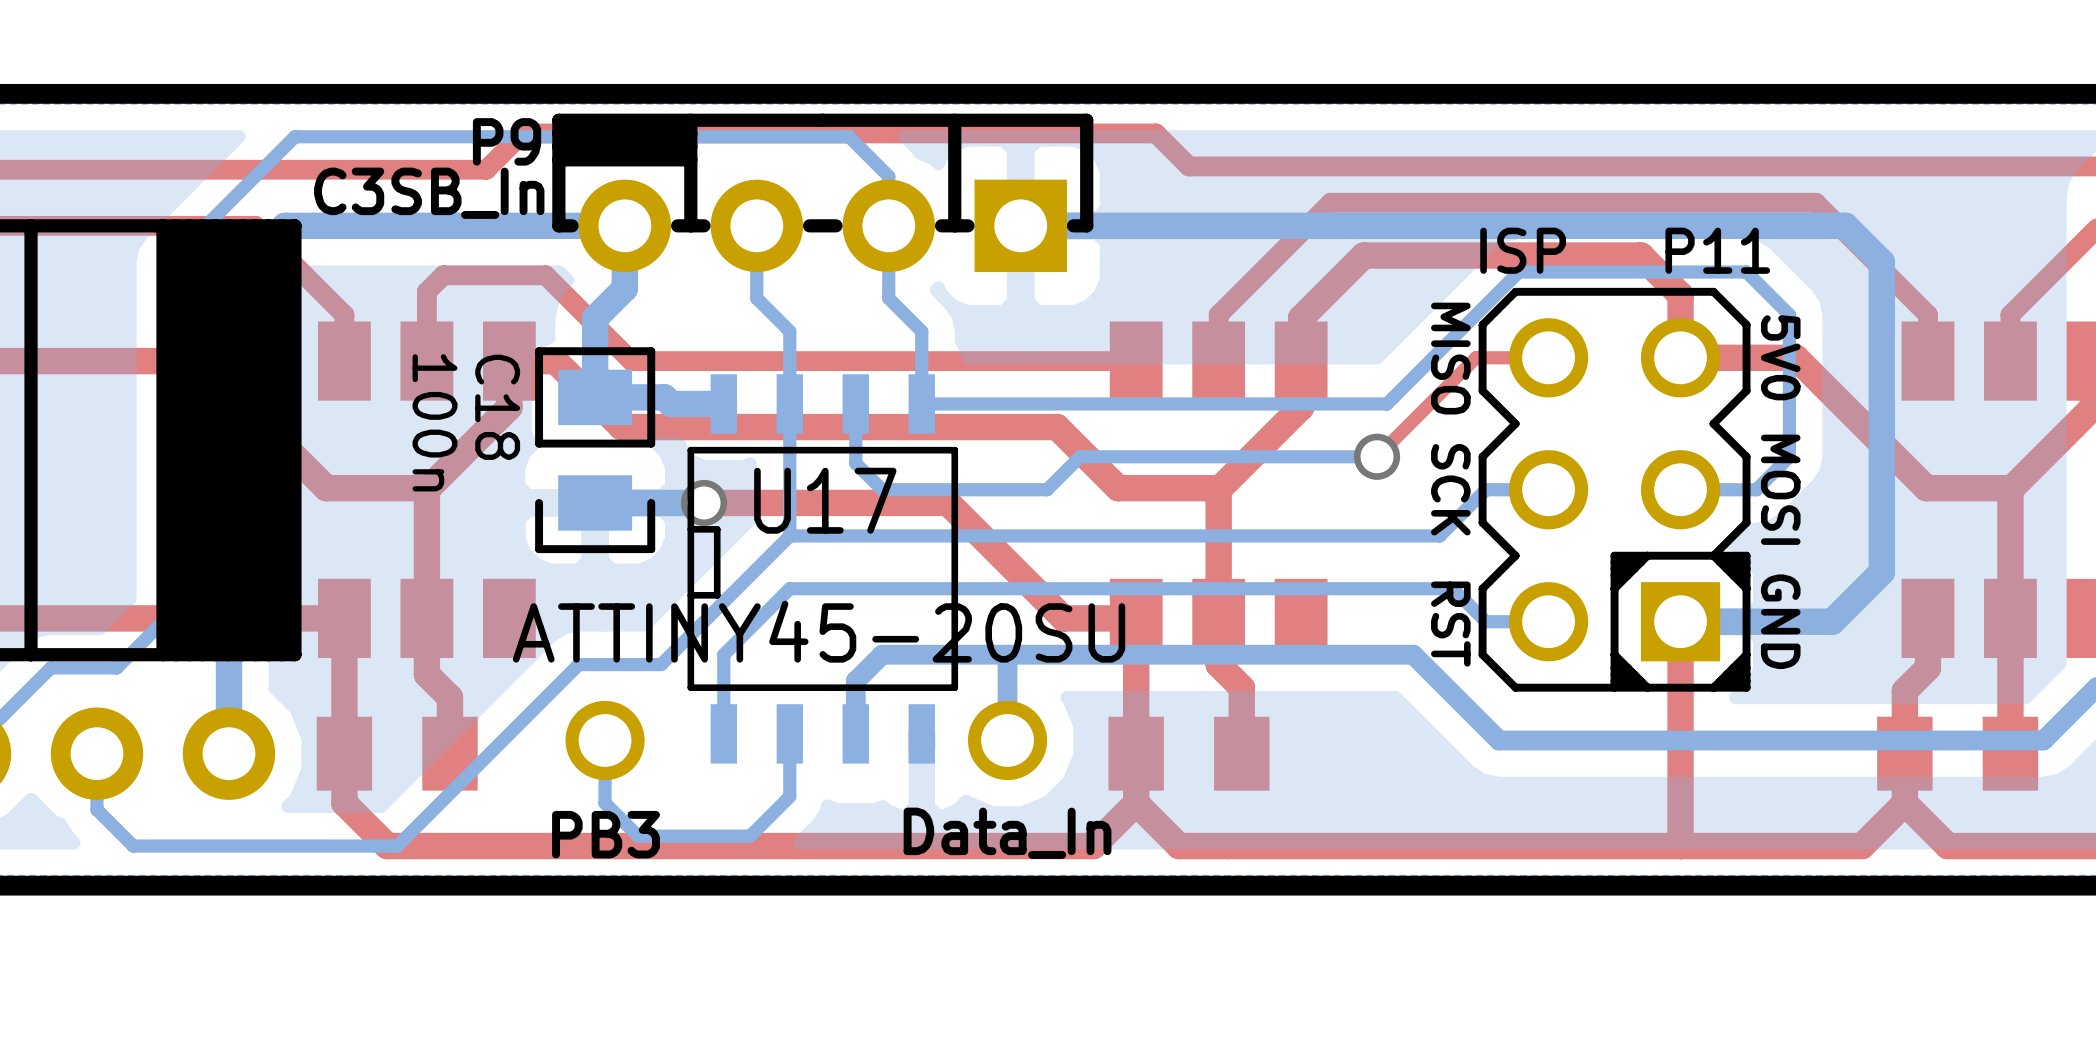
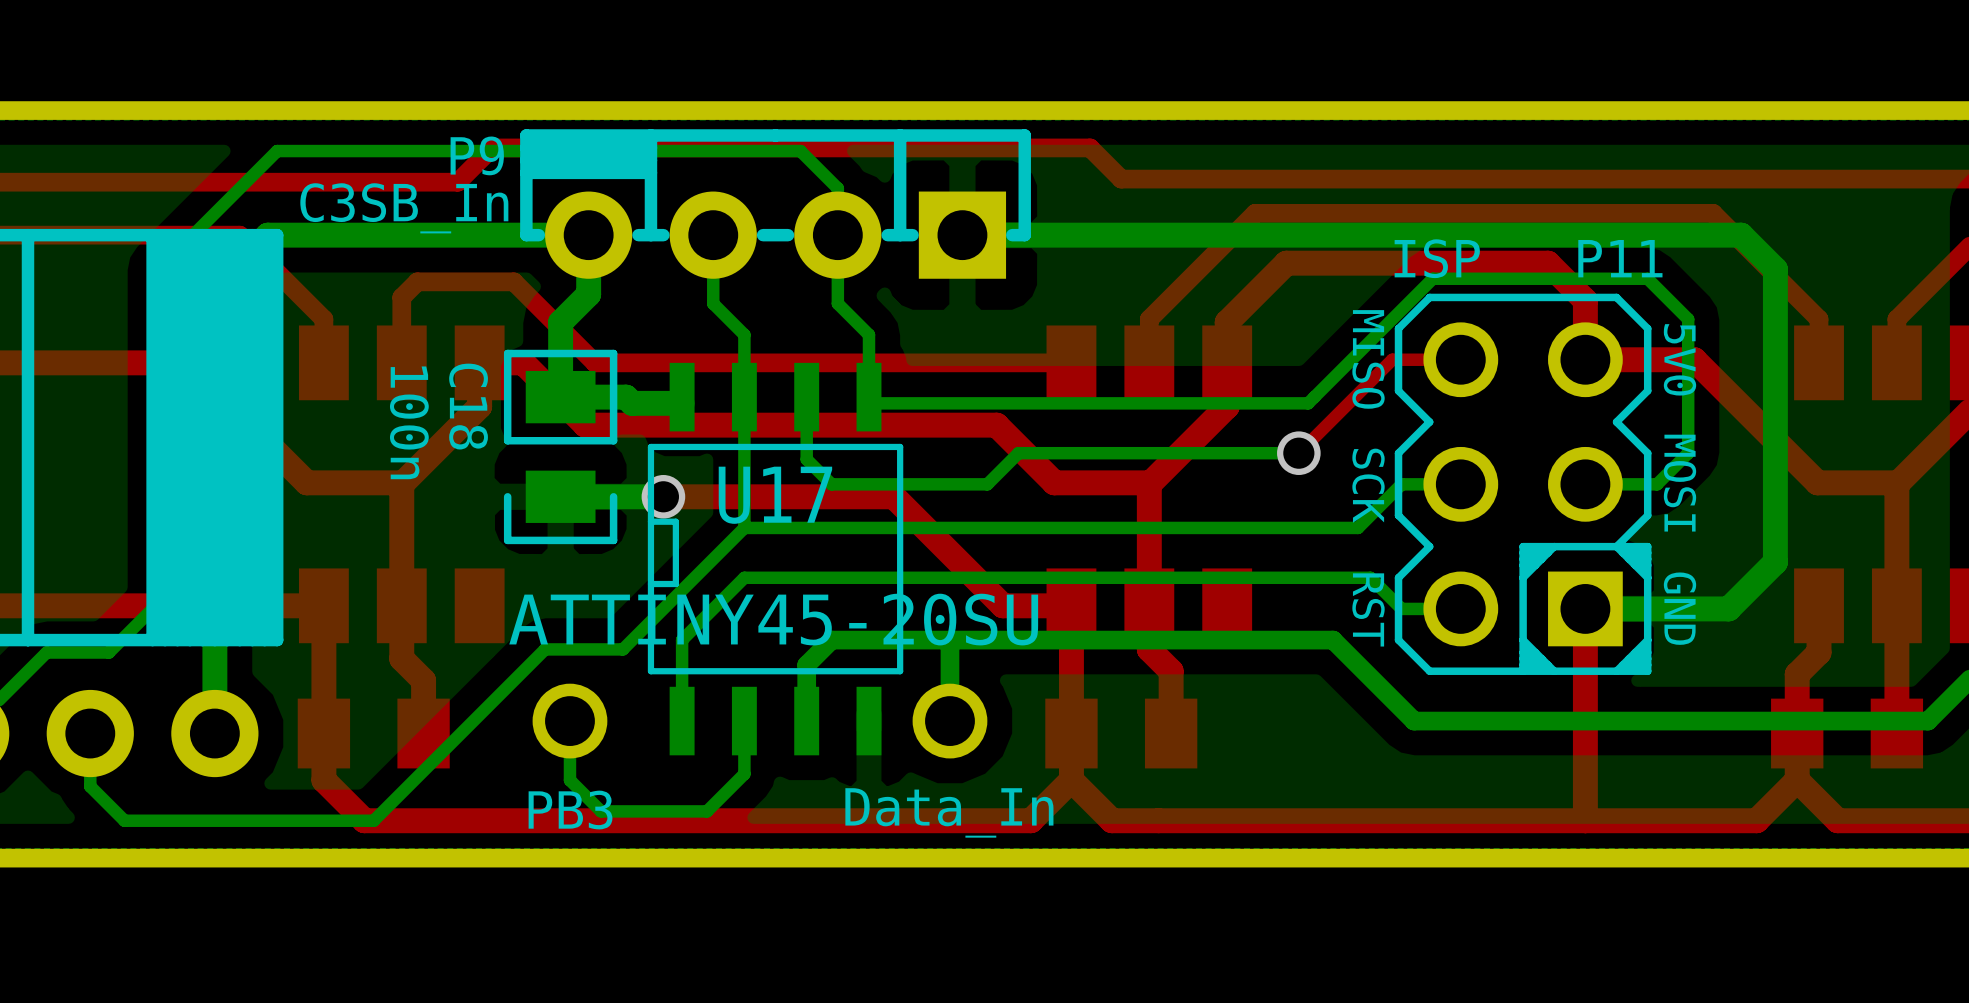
U17 footprint: [687, 374, 959, 764] -> [647, 362, 904, 756]

